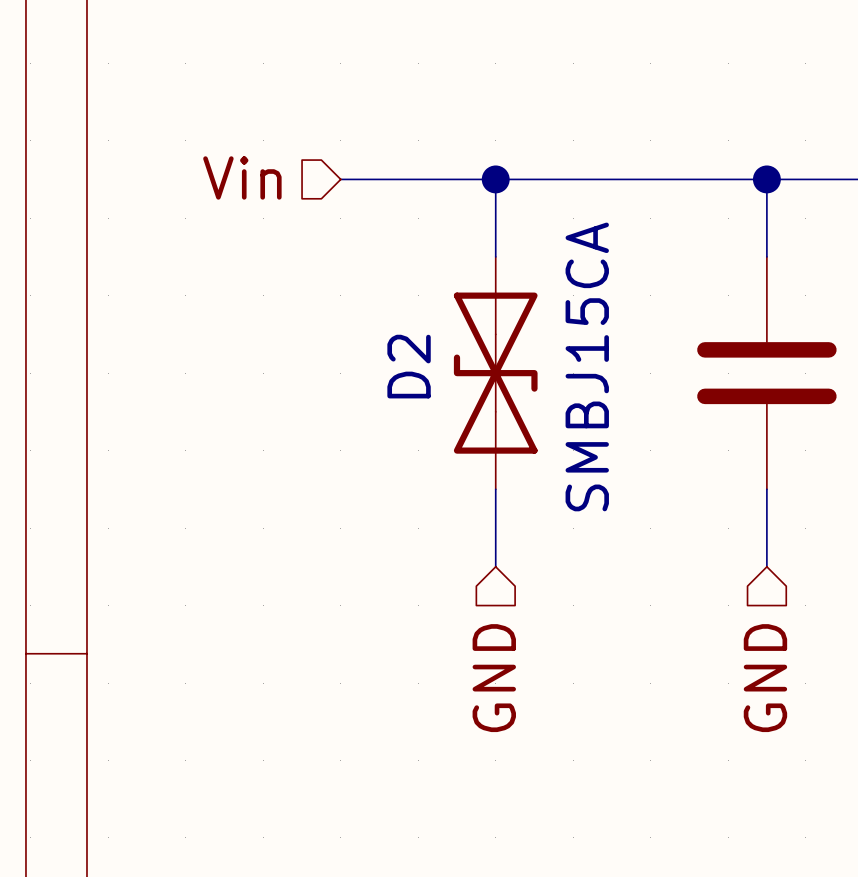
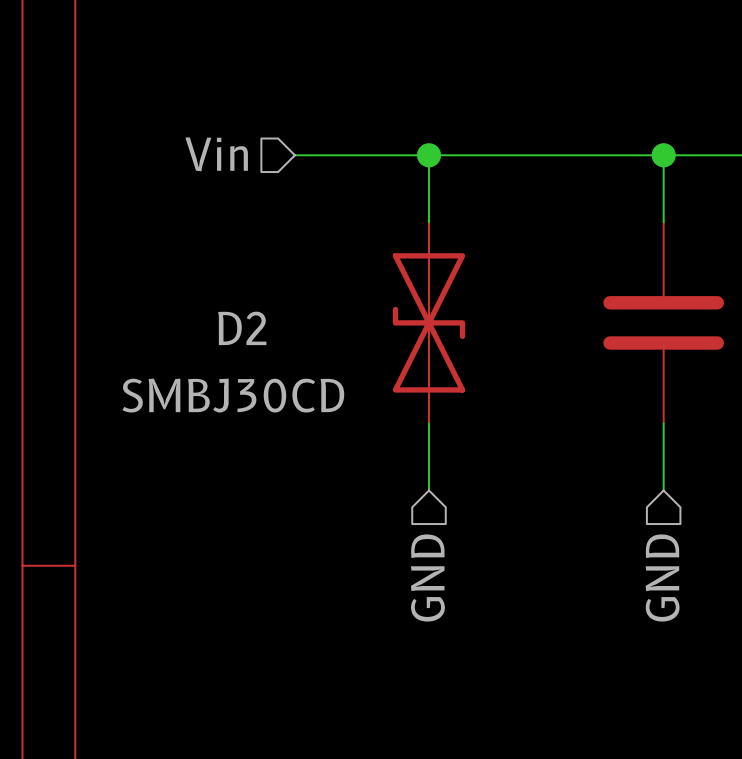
D2 name rotation: 0° (409, 366) -> 90° clockwise (242, 328)
D2 name position: D2 (409, 366) -> D2 (242, 328)
D2 value: SMBJ15CA (587, 366) -> SMBJ30CD (233, 395)

